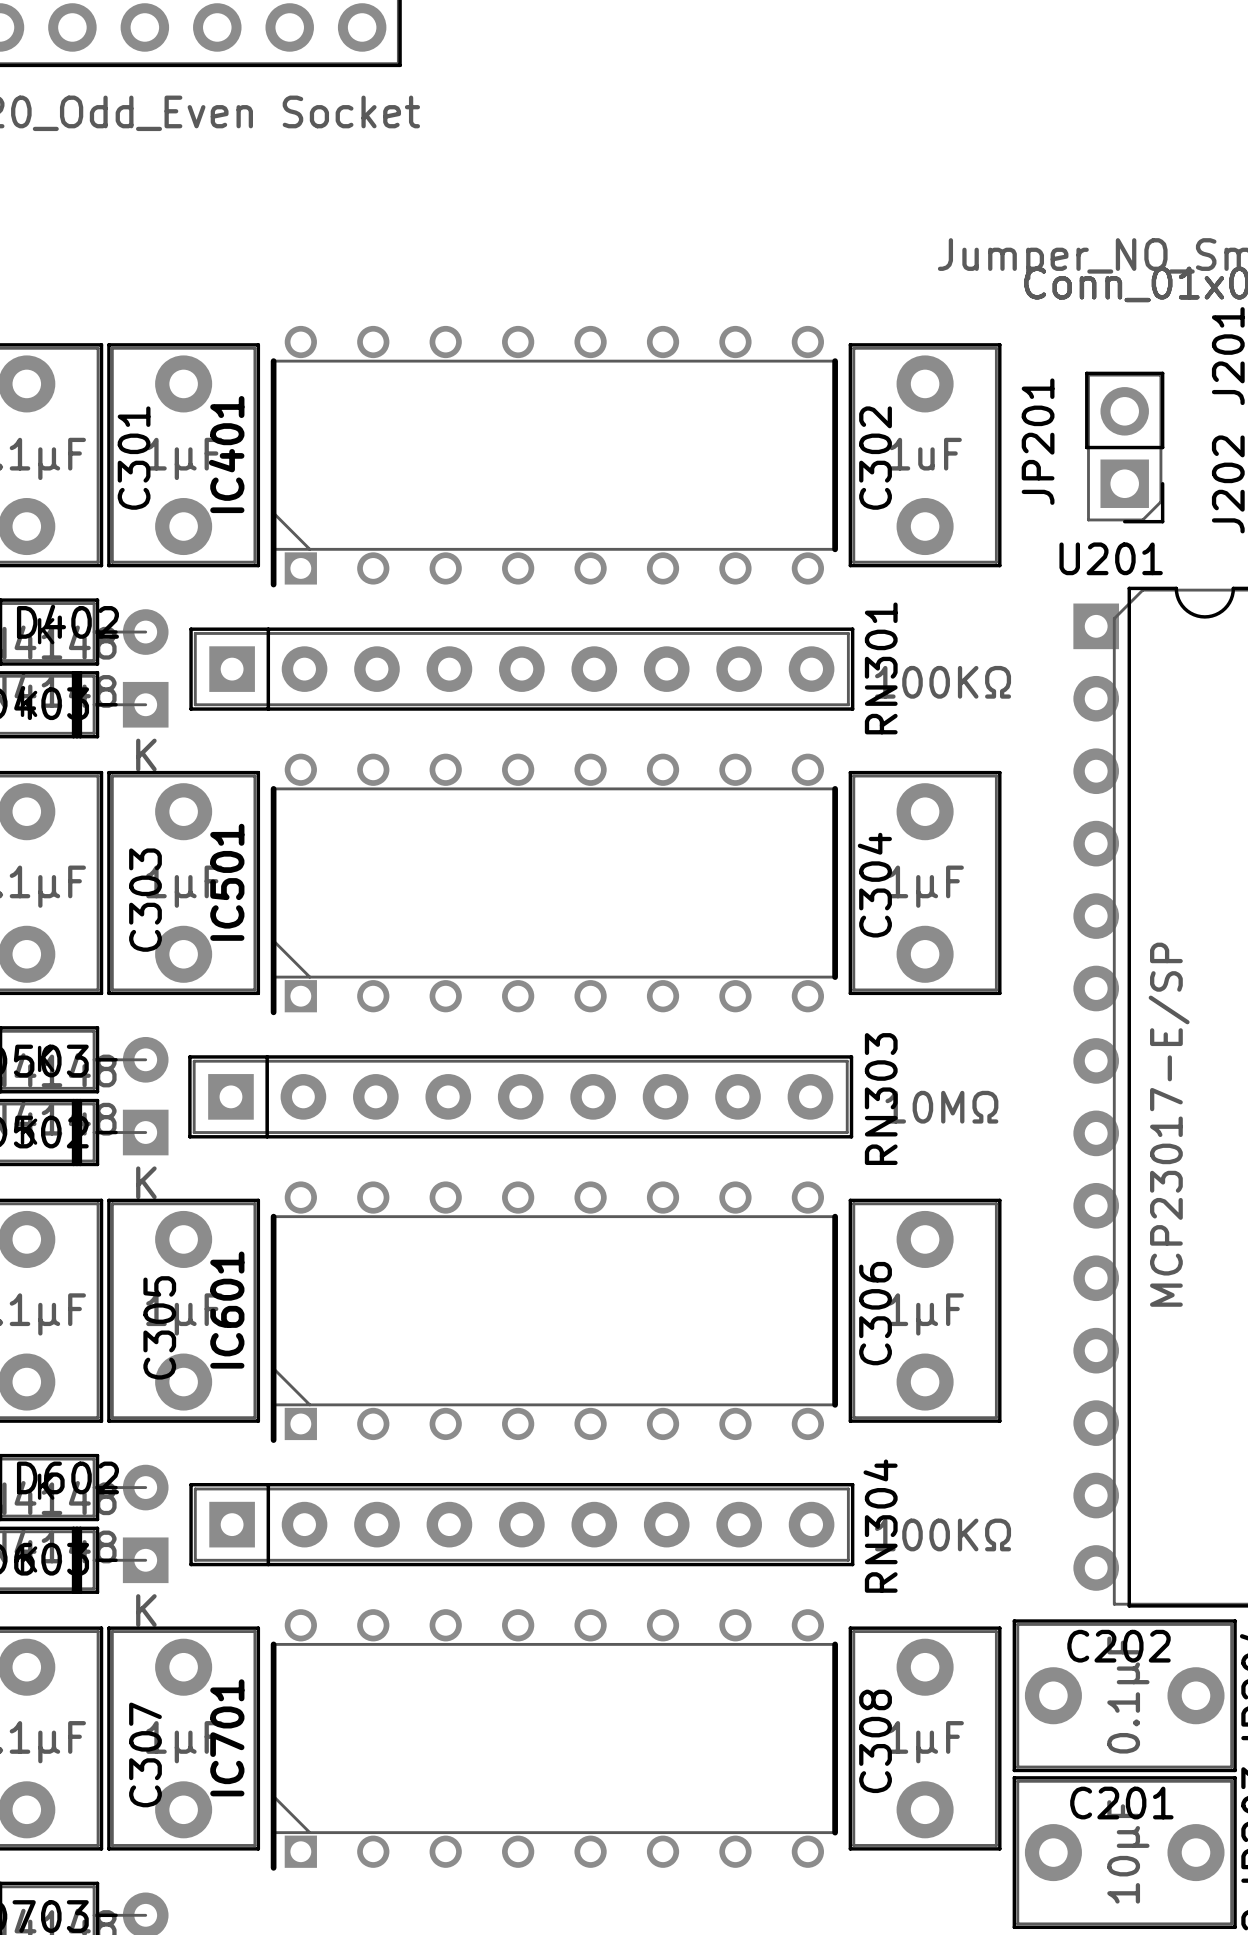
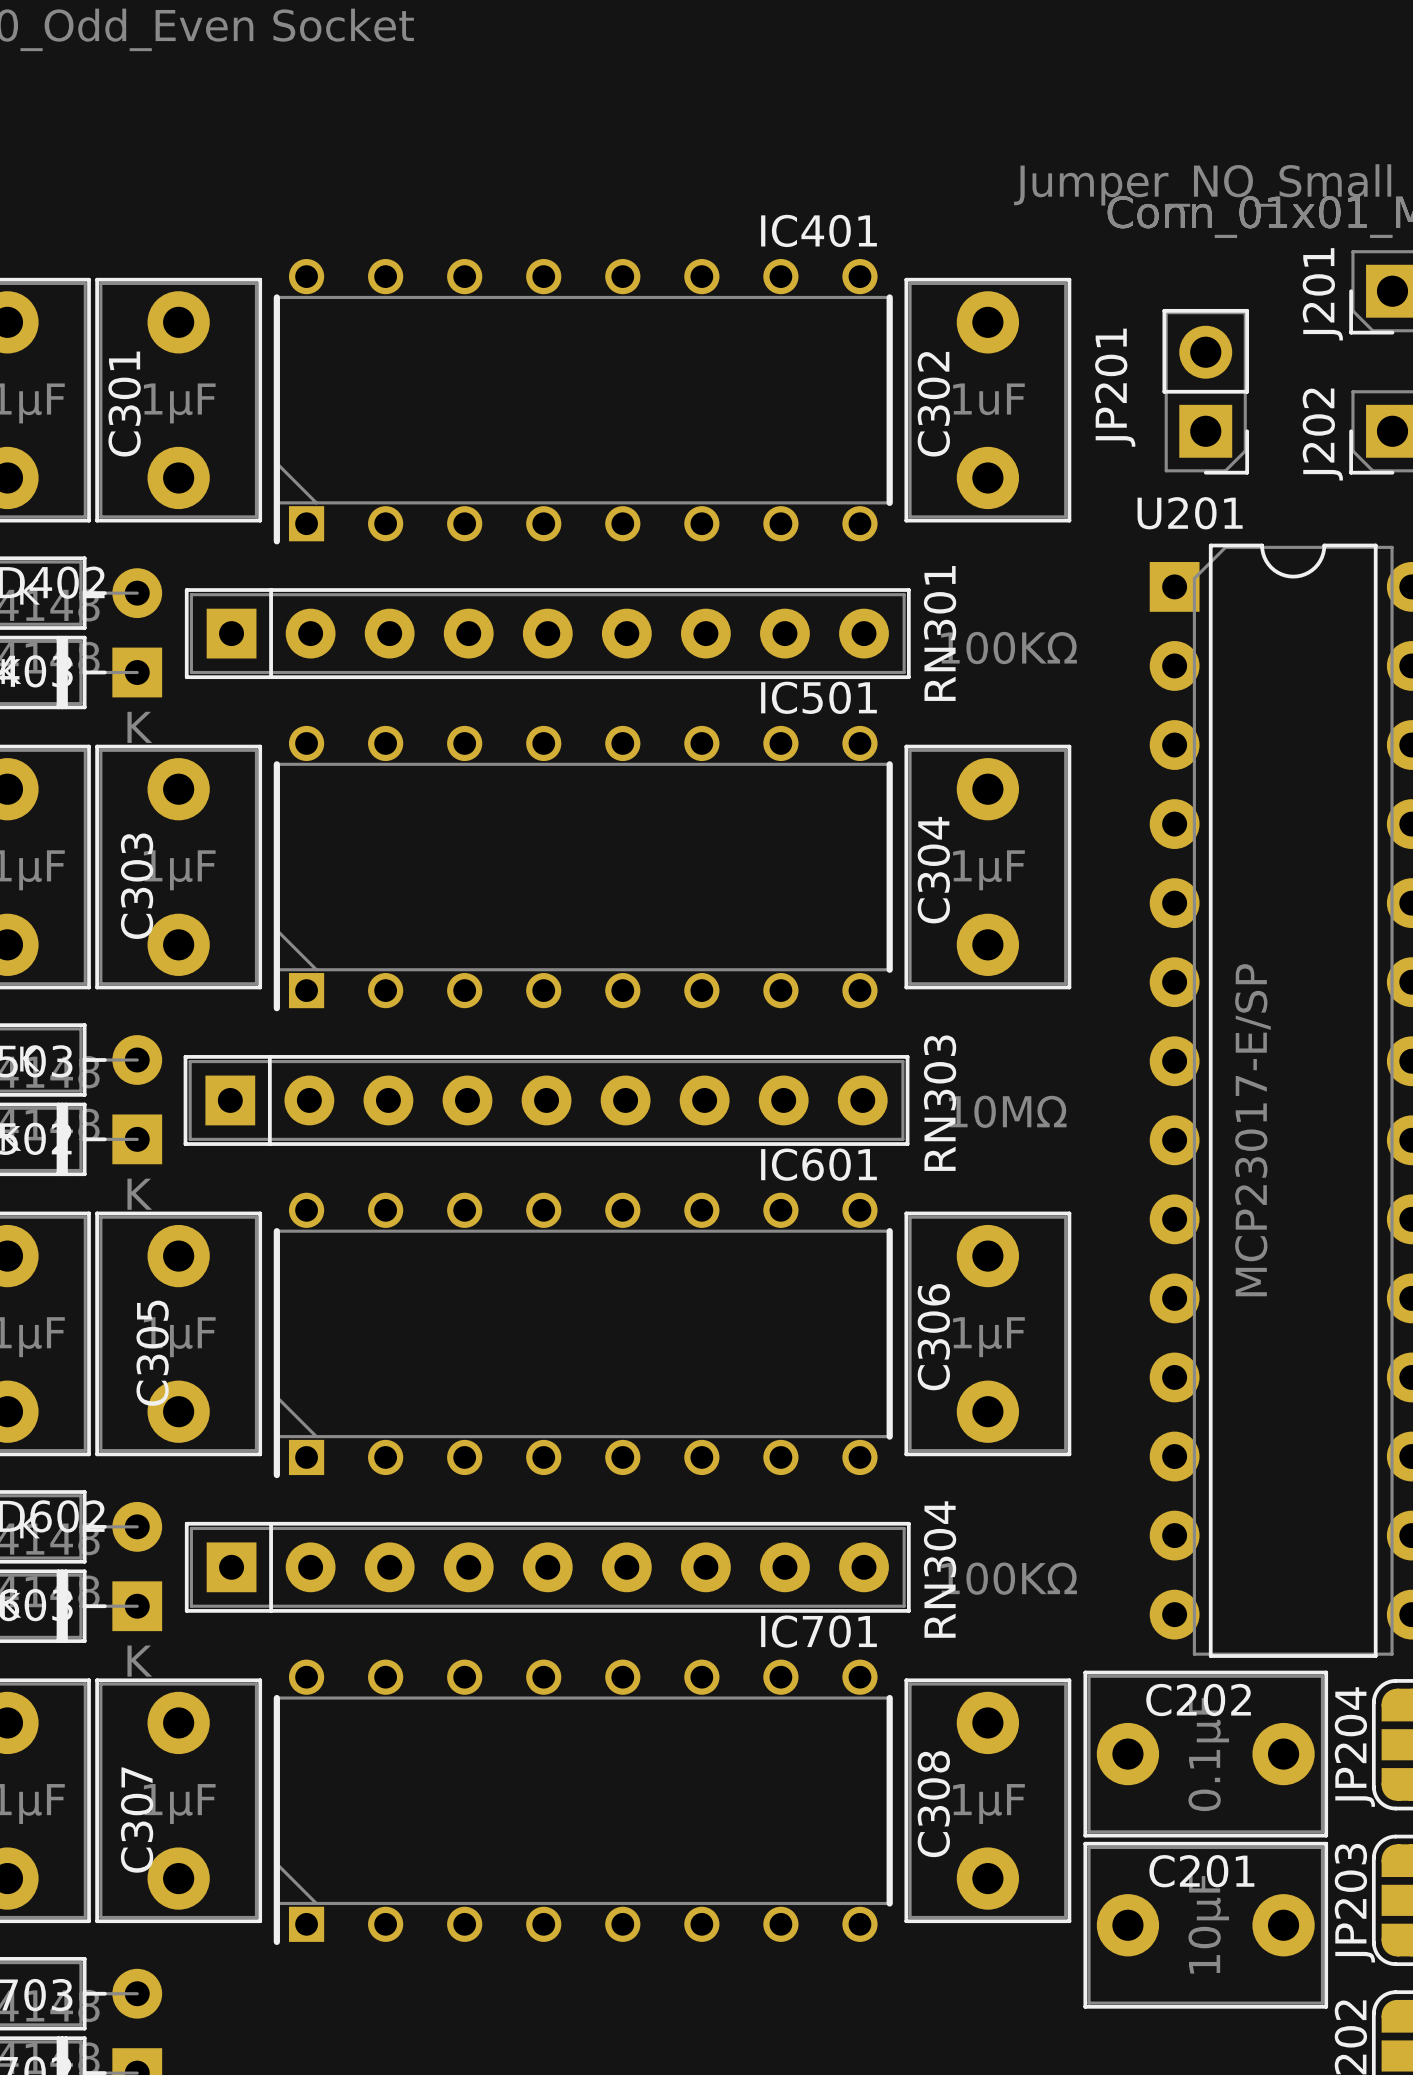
IC401 name rotation: 0° (226, 454) -> 90° clockwise (819, 230)
IC401 name position: IC401 (226, 454) -> IC401 (819, 230)
IC501 name rotation: 0° (227, 882) -> 90° clockwise (819, 697)
IC501 name position: IC501 (227, 882) -> IC501 (819, 697)
IC601 name rotation: 0° (227, 1310) -> 90° clockwise (819, 1164)
IC601 name position: IC601 (227, 1310) -> IC601 (819, 1164)
IC701 name rotation: 0° (227, 1737) -> 90° clockwise (819, 1631)
IC701 name position: IC701 (227, 1737) -> IC701 (819, 1631)

